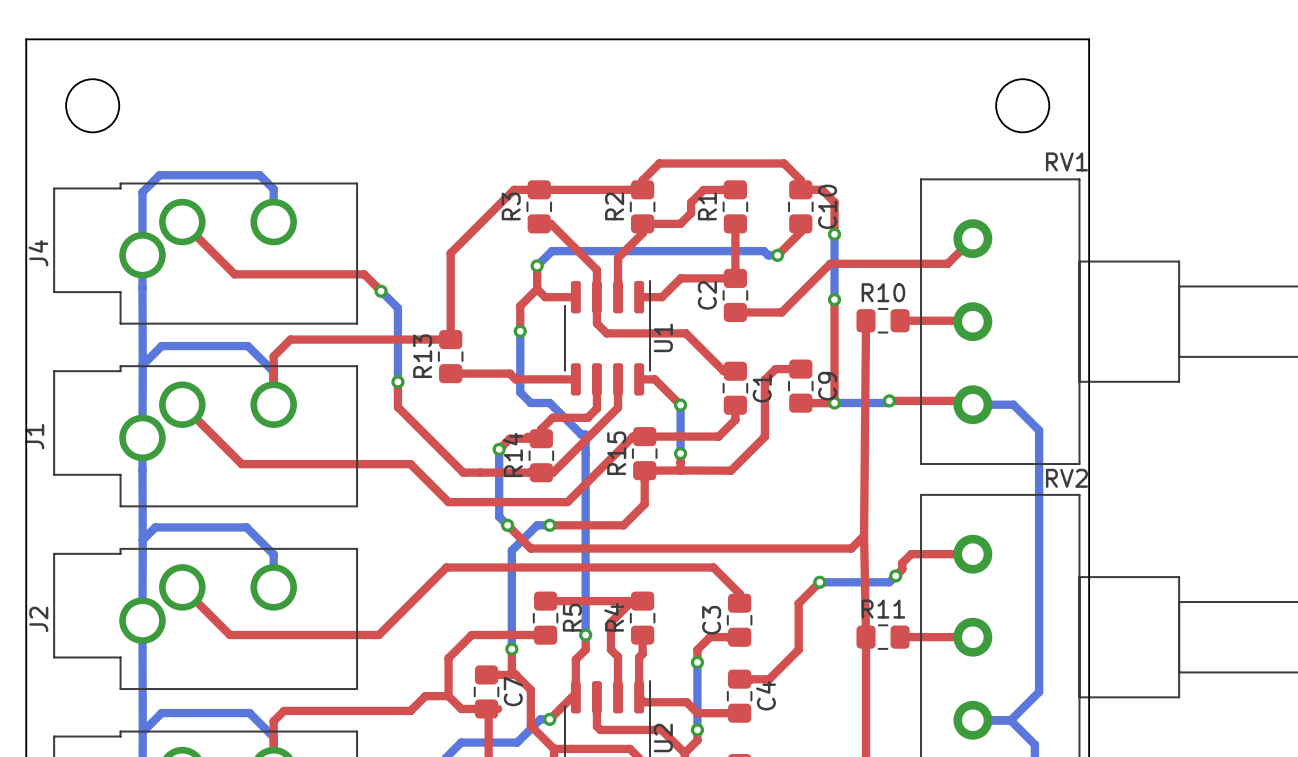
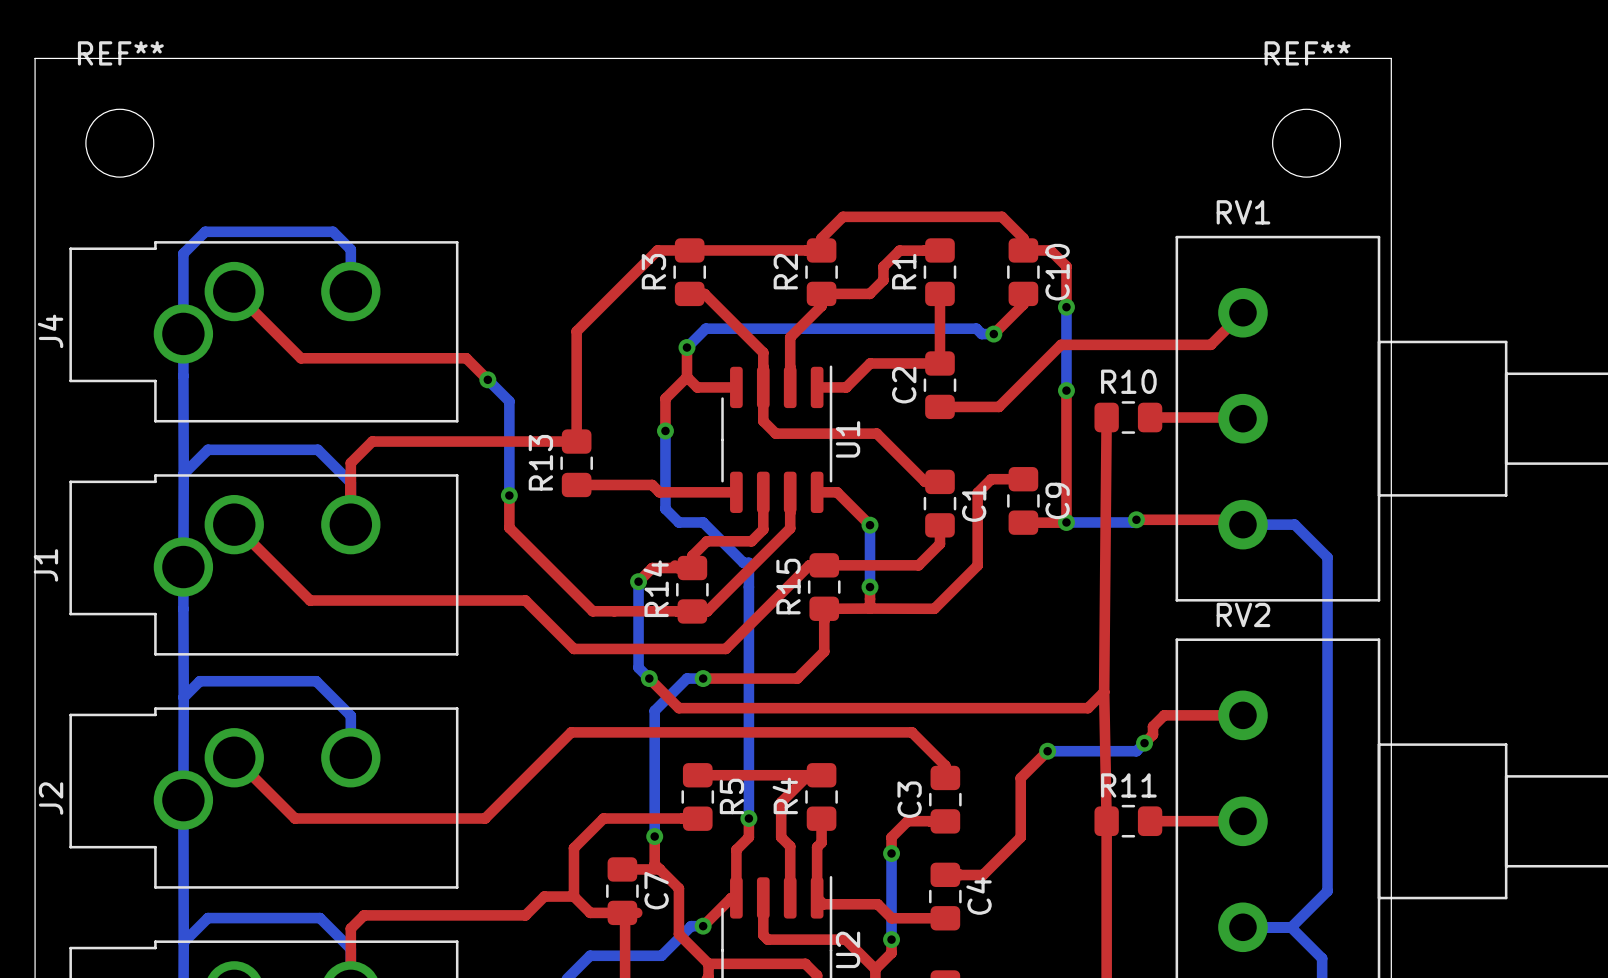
REF** name: none -> REF** (120, 53)
REF** name: none -> REF** (1307, 53)
RV1 name position: RV1 (1066, 161) -> RV1 (1243, 212)
RV2 name position: RV2 (1066, 478) -> RV2 (1243, 614)

